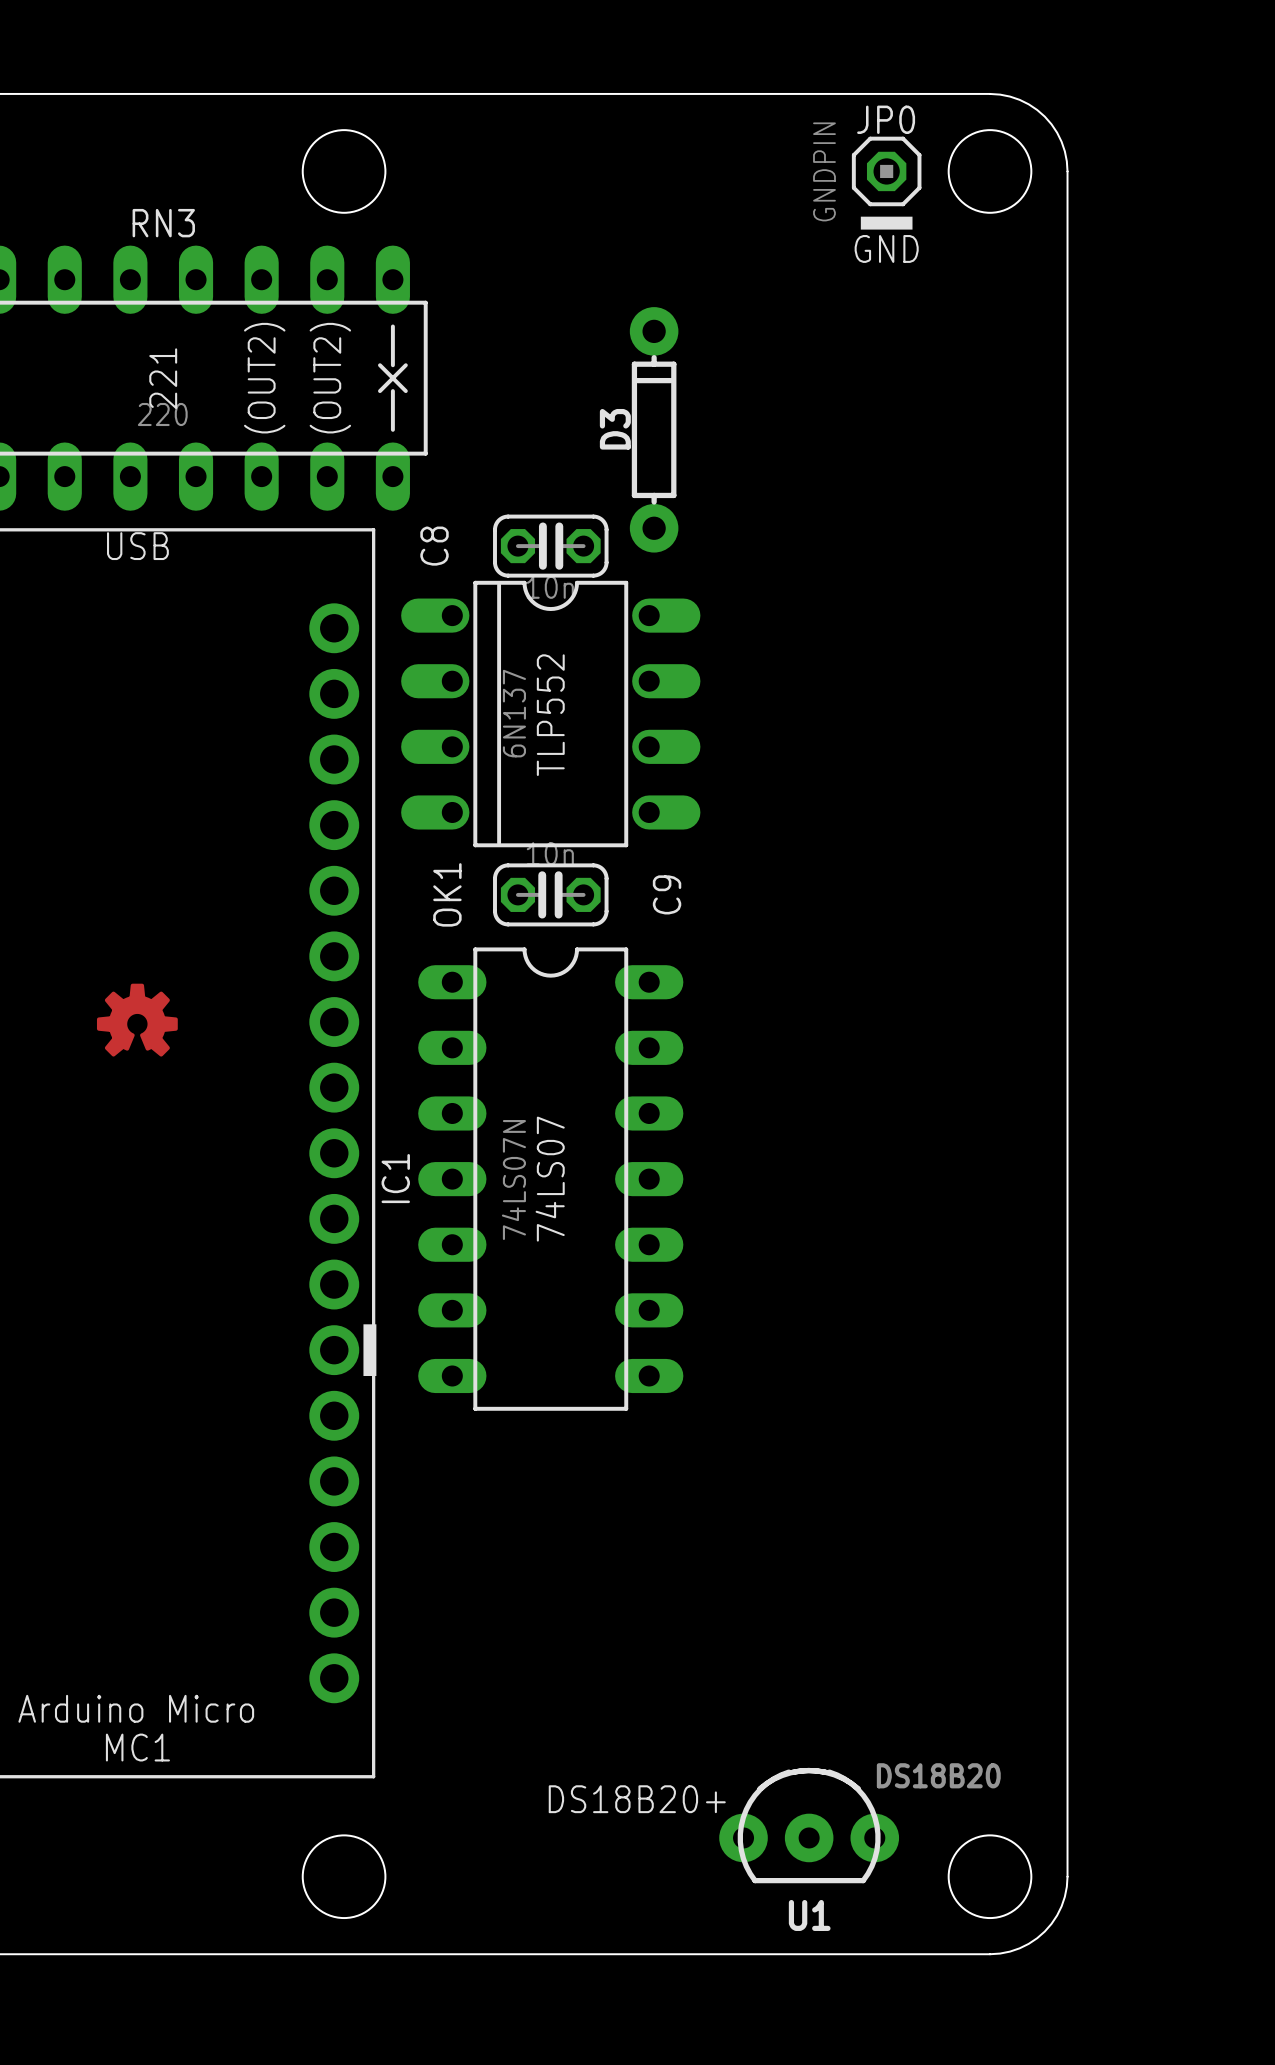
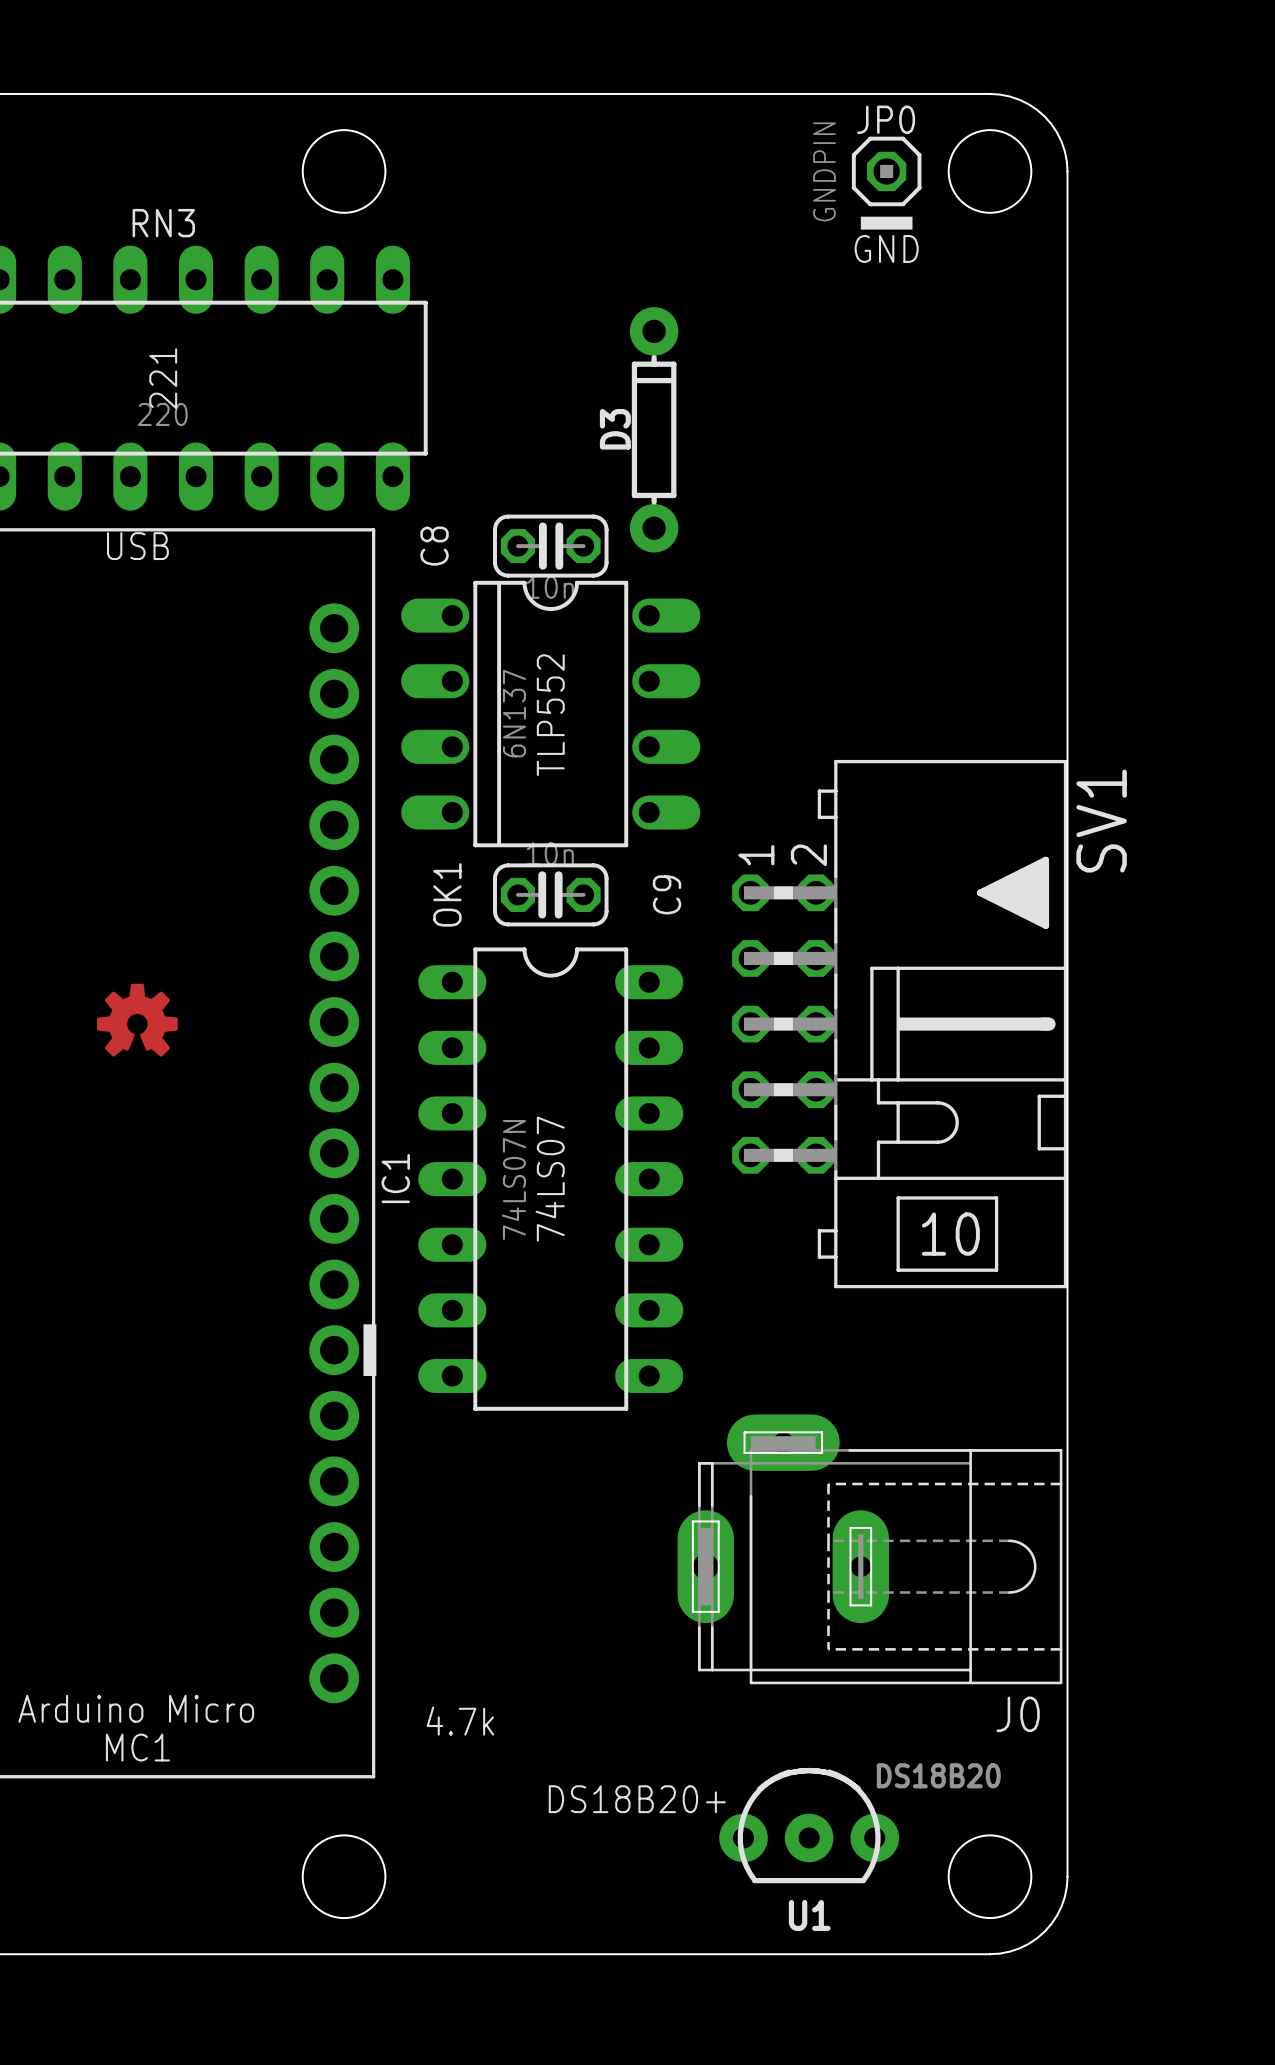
line: (392, 326) (392, 365) -> none
line: (379, 365) (405, 391) -> none
line: (405, 365) (379, 391) -> none
text: (OUT2) (264, 378) -> none
text: (OUT2) (330, 378) -> none
line: (392, 391) (392, 429) -> none
SV1: none -> (899, 1024)
J0: none -> (869, 1549)
text: none -> 4.7k (460, 1721)

